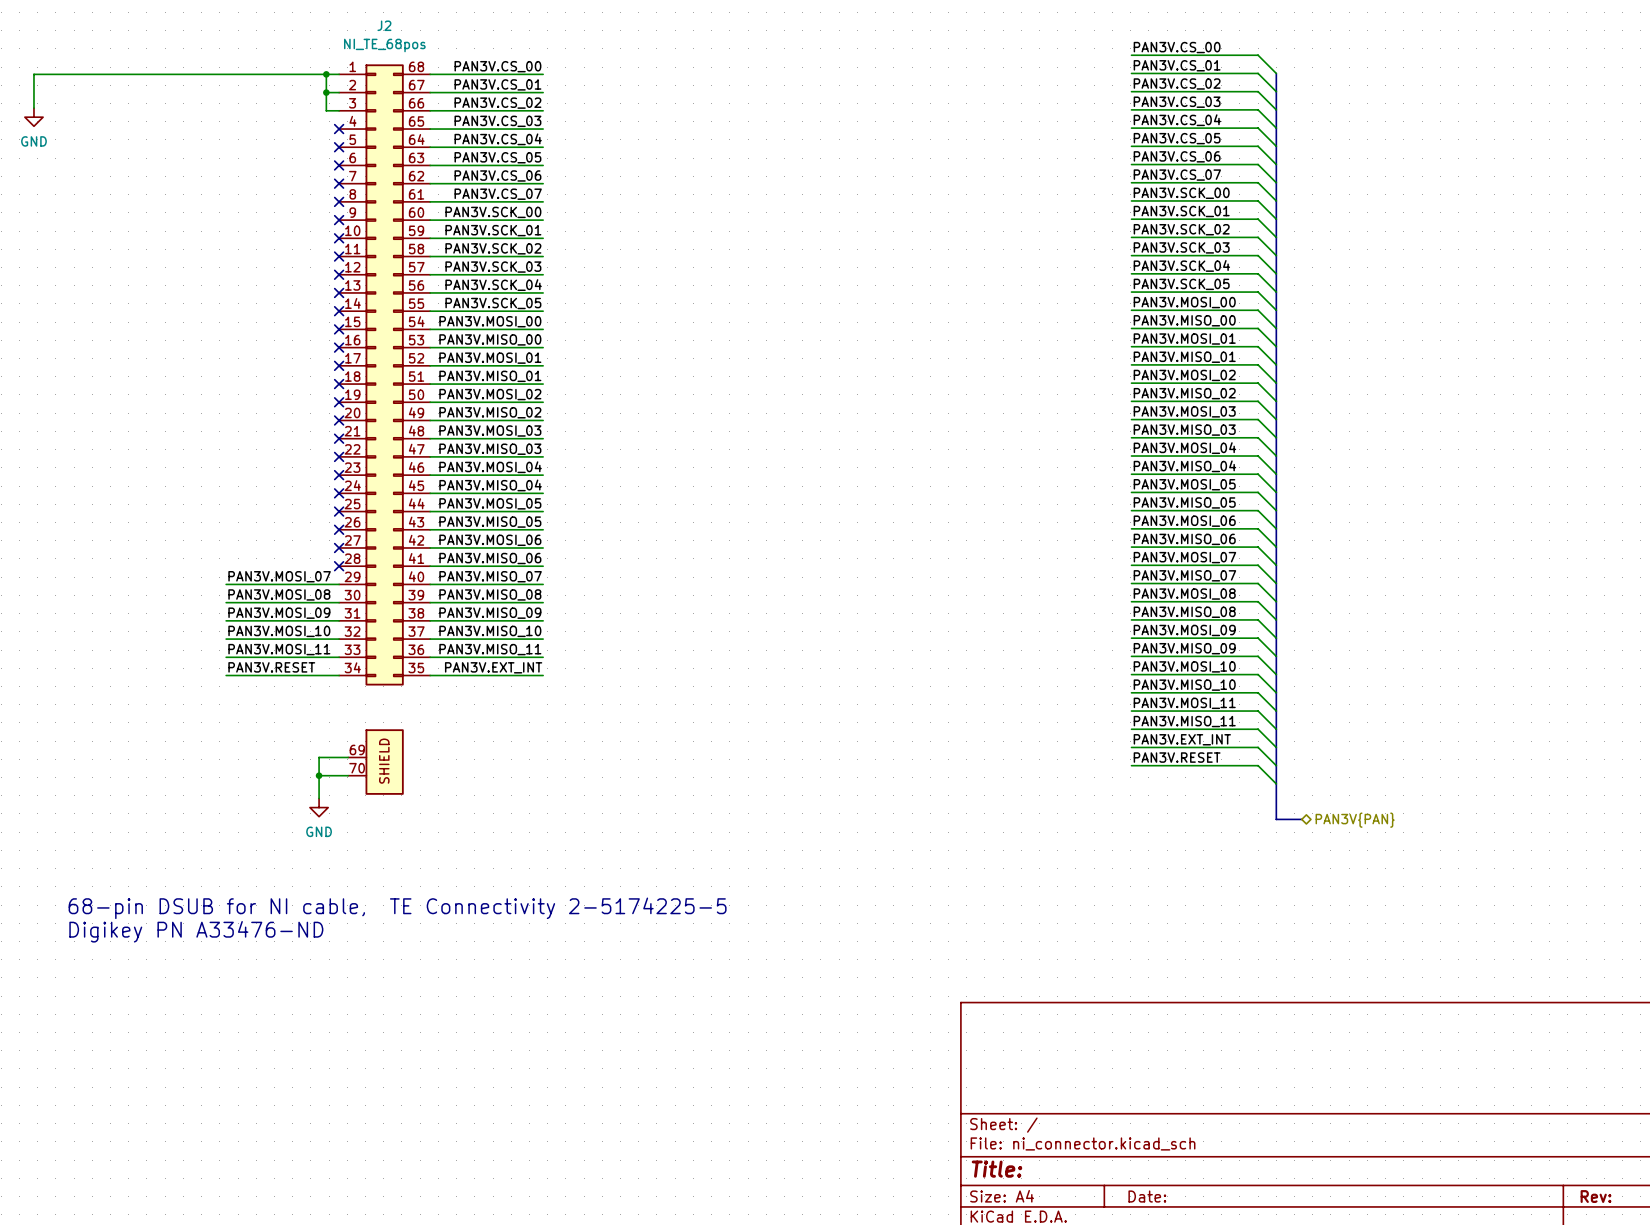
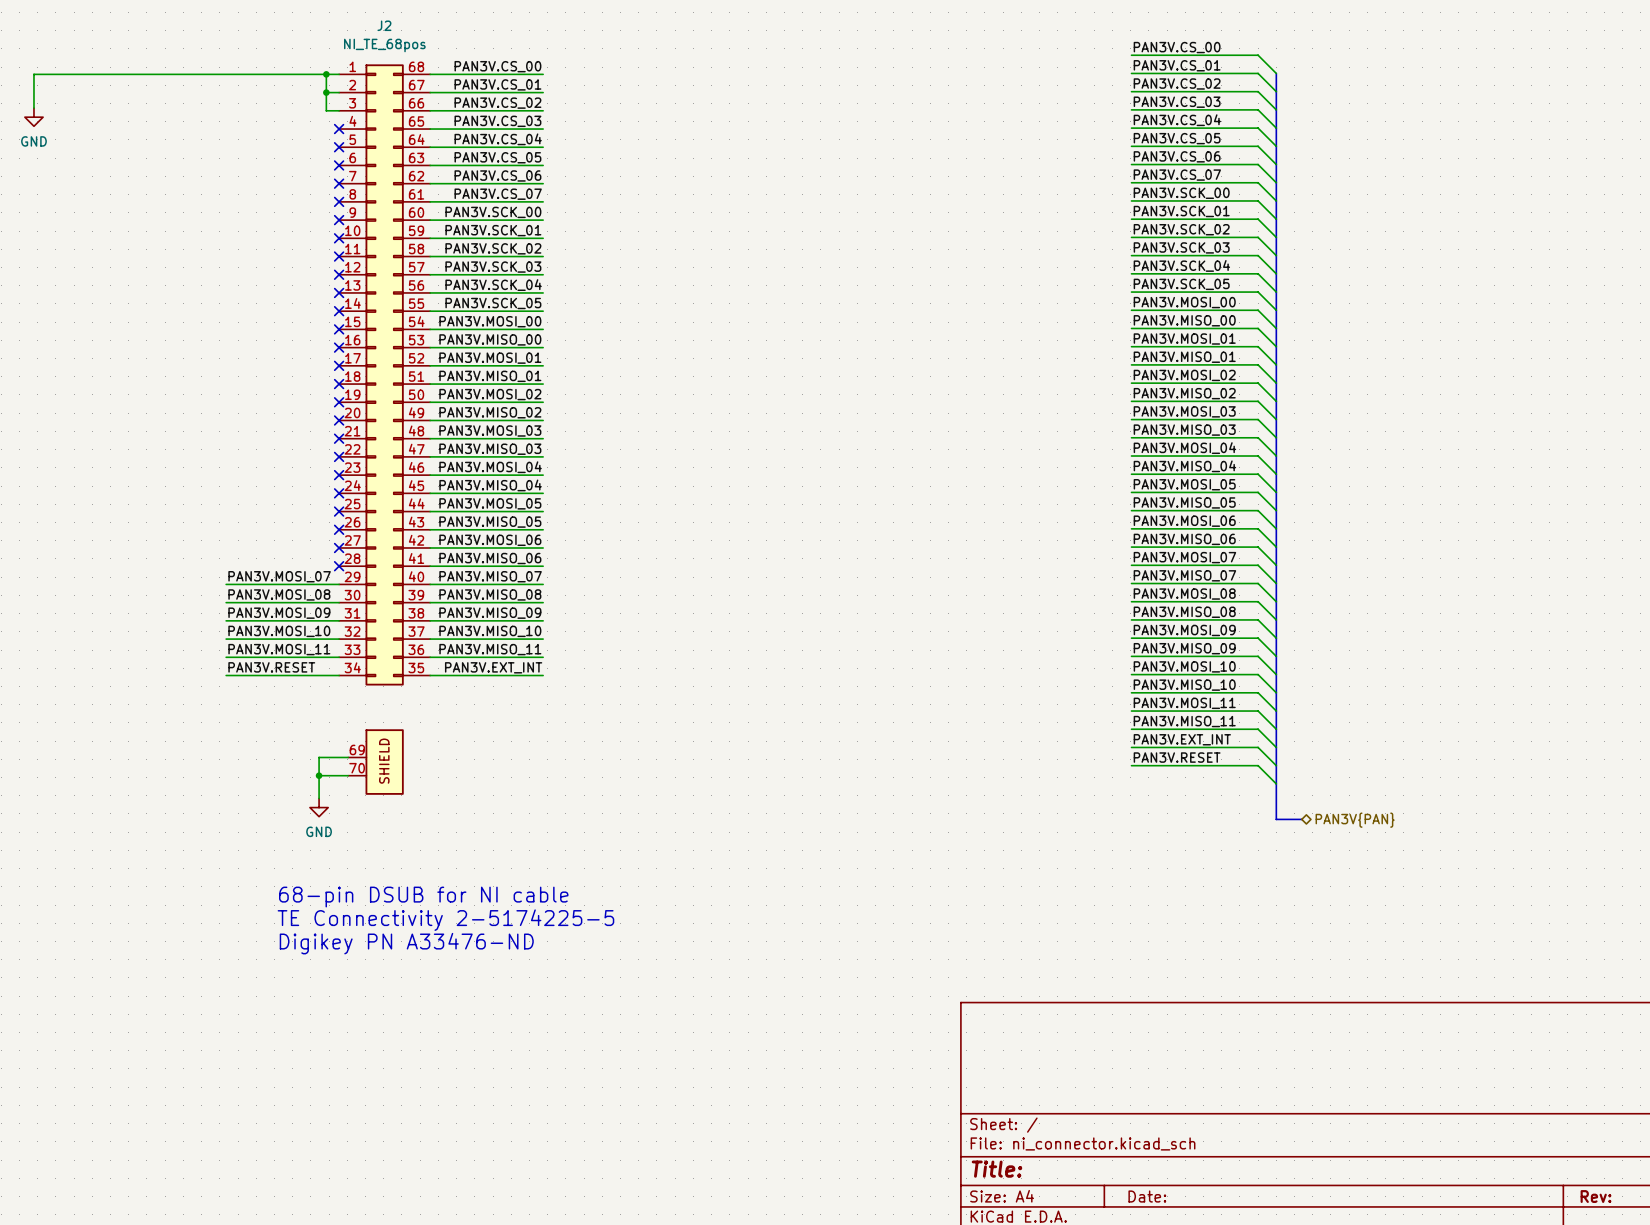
text: none -> 68-pin DSUB for NI cable (423, 897)
text: 68-pin DSUB for NI cable, TE Connectivity 2-5174225-5 (397, 908) -> none
text: none -> TE Connectivity 2-5174225-5 (445, 920)
text: Digikey PN A33476-ND (196, 931) -> none
text: none -> Digikey PN A33476-ND (406, 943)

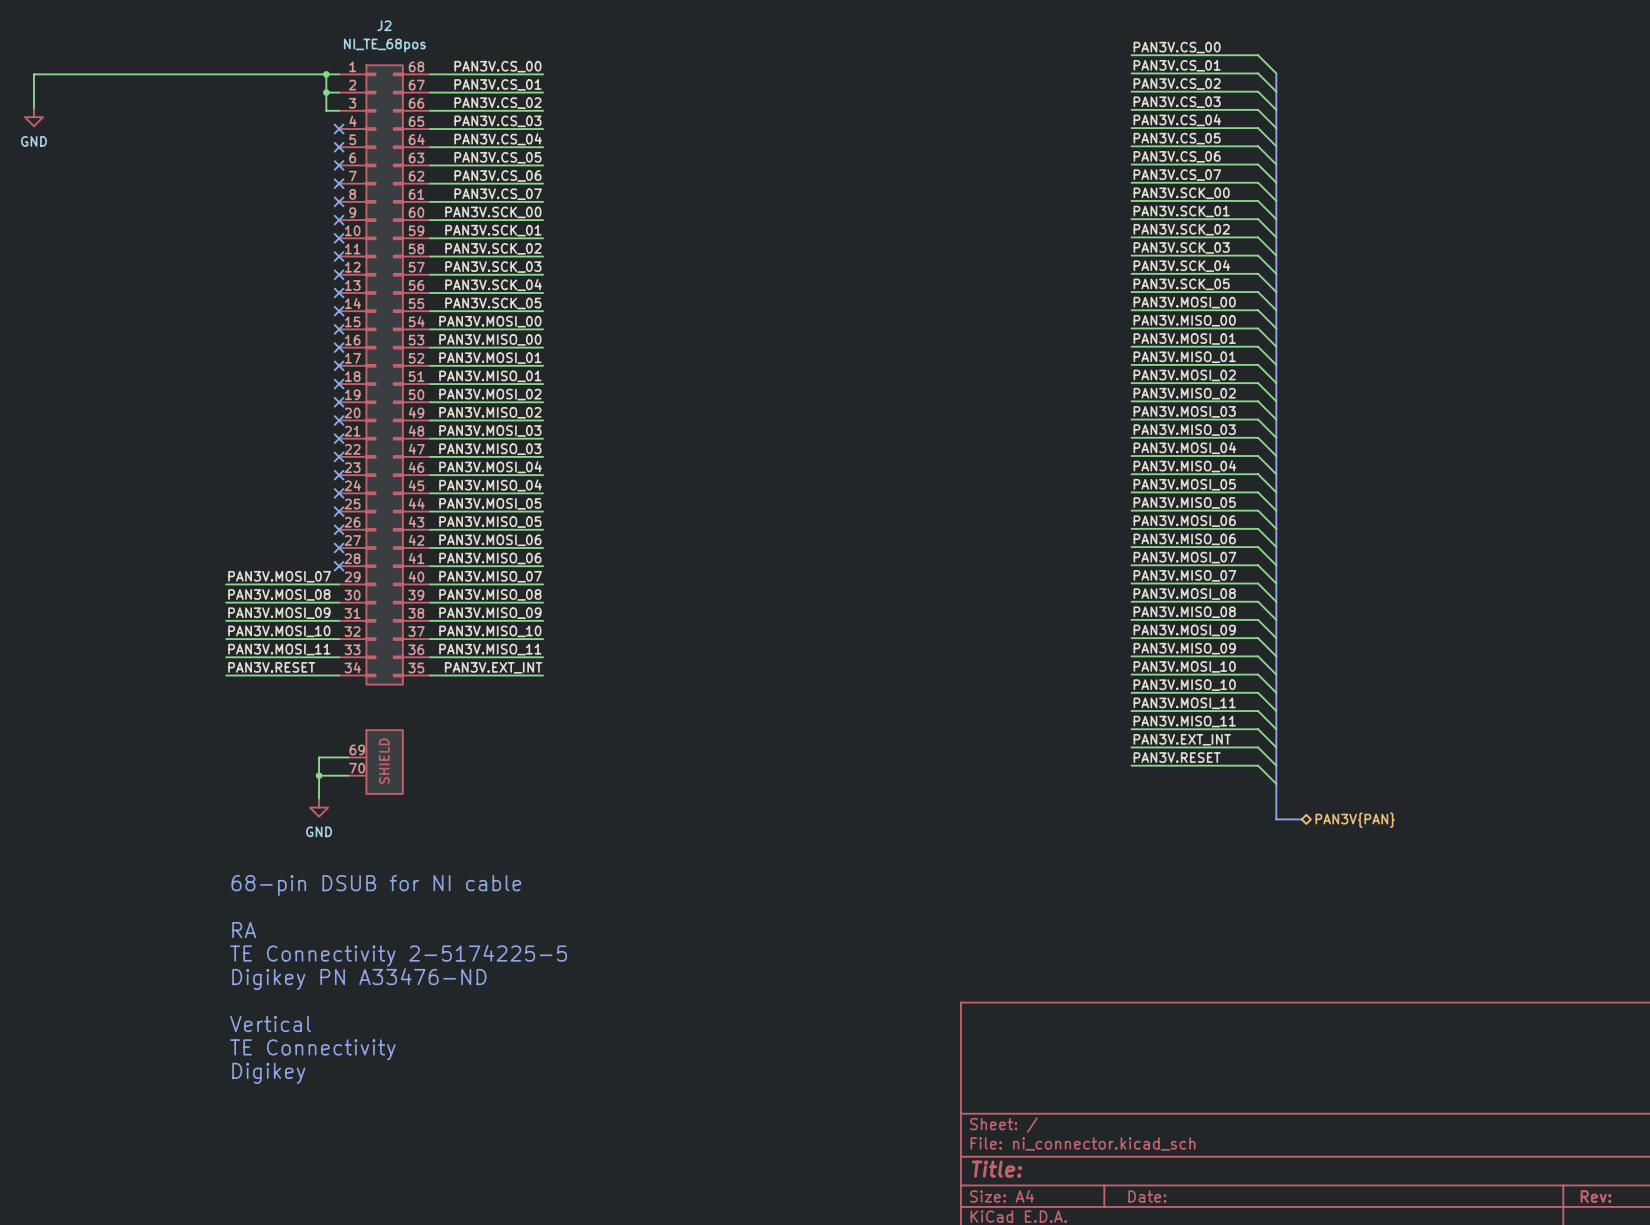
text position: 68-pin DSUB for NI cable (423, 897) -> 68-pin DSUB for NI cable (376, 885)
text position: TE Connectivity 2-5174225-5 (445, 920) -> TE Connectivity 2-5174225-5 (398, 955)
text: none -> RA (244, 930)
text position: Digikey PN A33476-ND (406, 943) -> Digikey PN A33476-ND (359, 979)
text: none -> Vertical (270, 1023)
text: none -> TE Connectivity (312, 1049)
text: none -> Digikey (268, 1073)

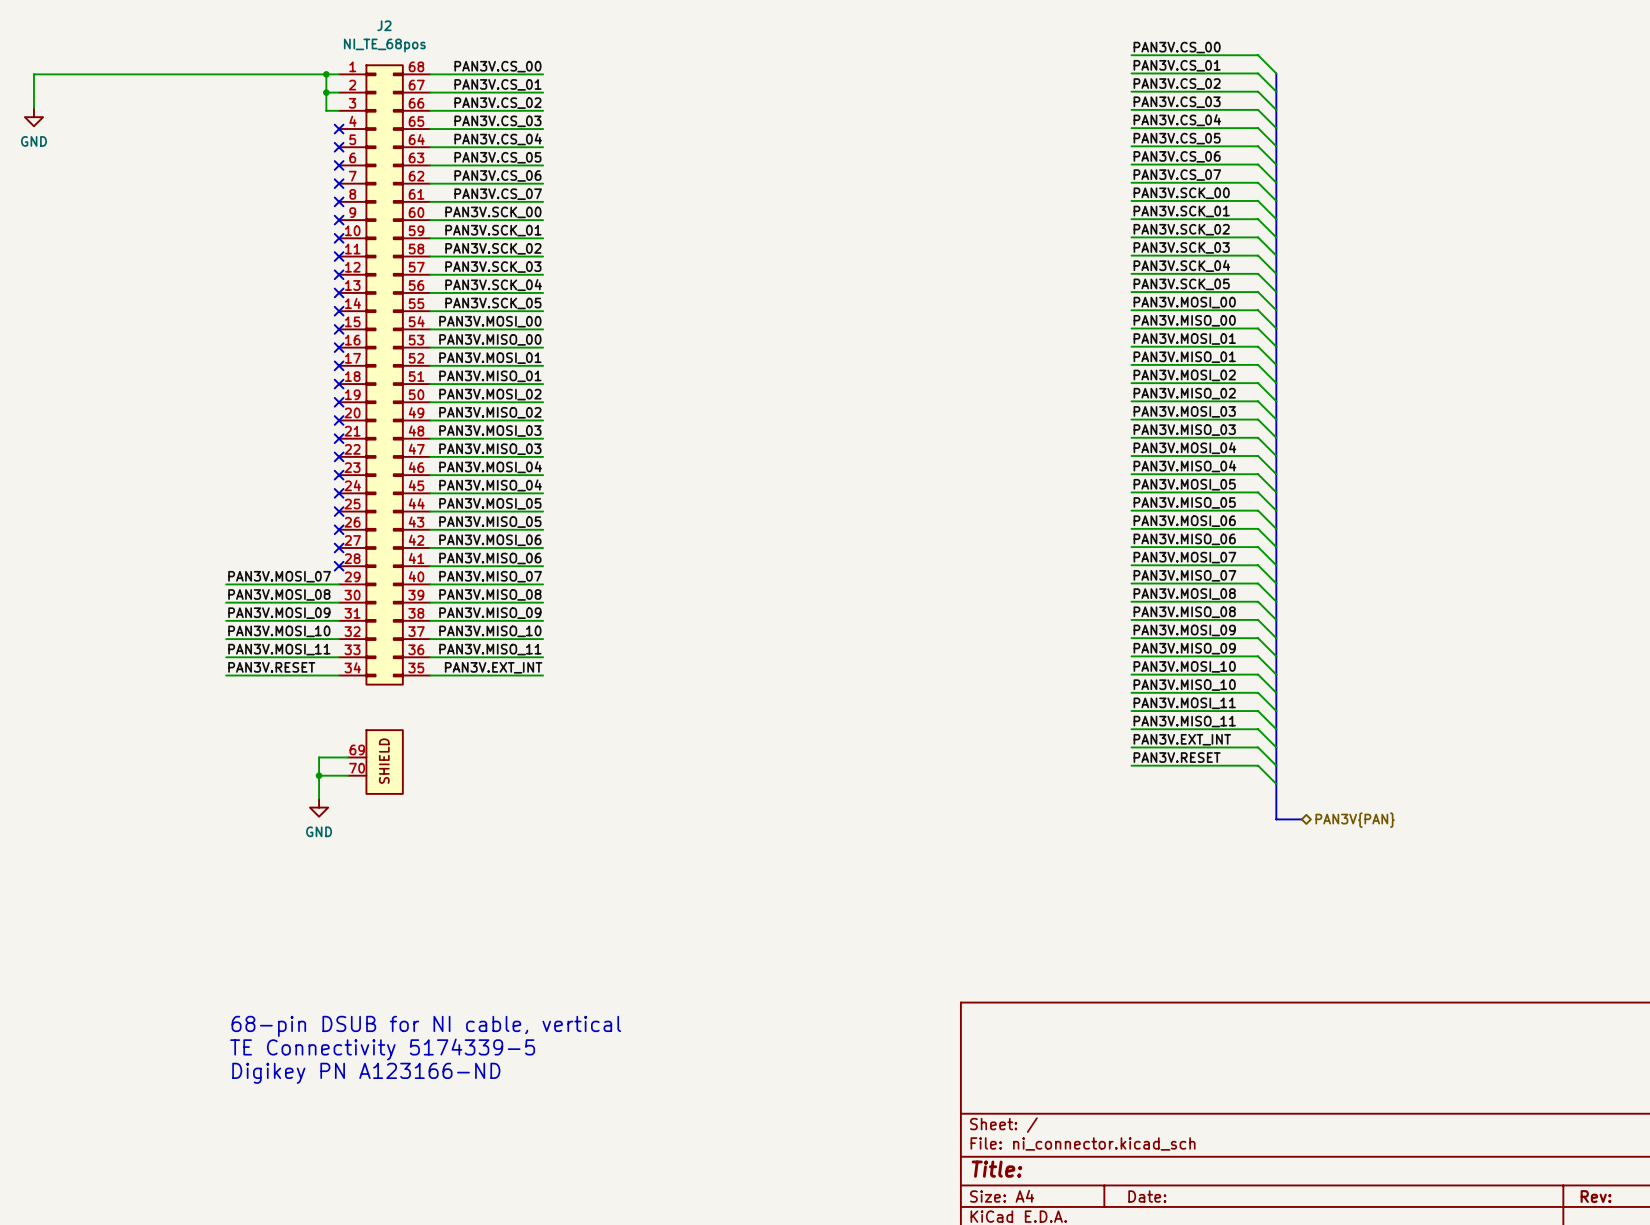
text: 68-pin DSUB for NI cable (376, 885) -> none
text: RA (244, 930) -> none
text: TE Connectivity 2-5174225-5 (398, 955) -> none
text: Digikey PN A33476-ND (359, 979) -> none
text: Vertical (270, 1023) -> 68-pin DSUB for NI cable, vertical (426, 1026)
text: TE Connectivity (312, 1049) -> TE Connectivity 5174339-5 (382, 1049)
text: Digikey (268, 1073) -> Digikey PN A123166-ND (366, 1073)

